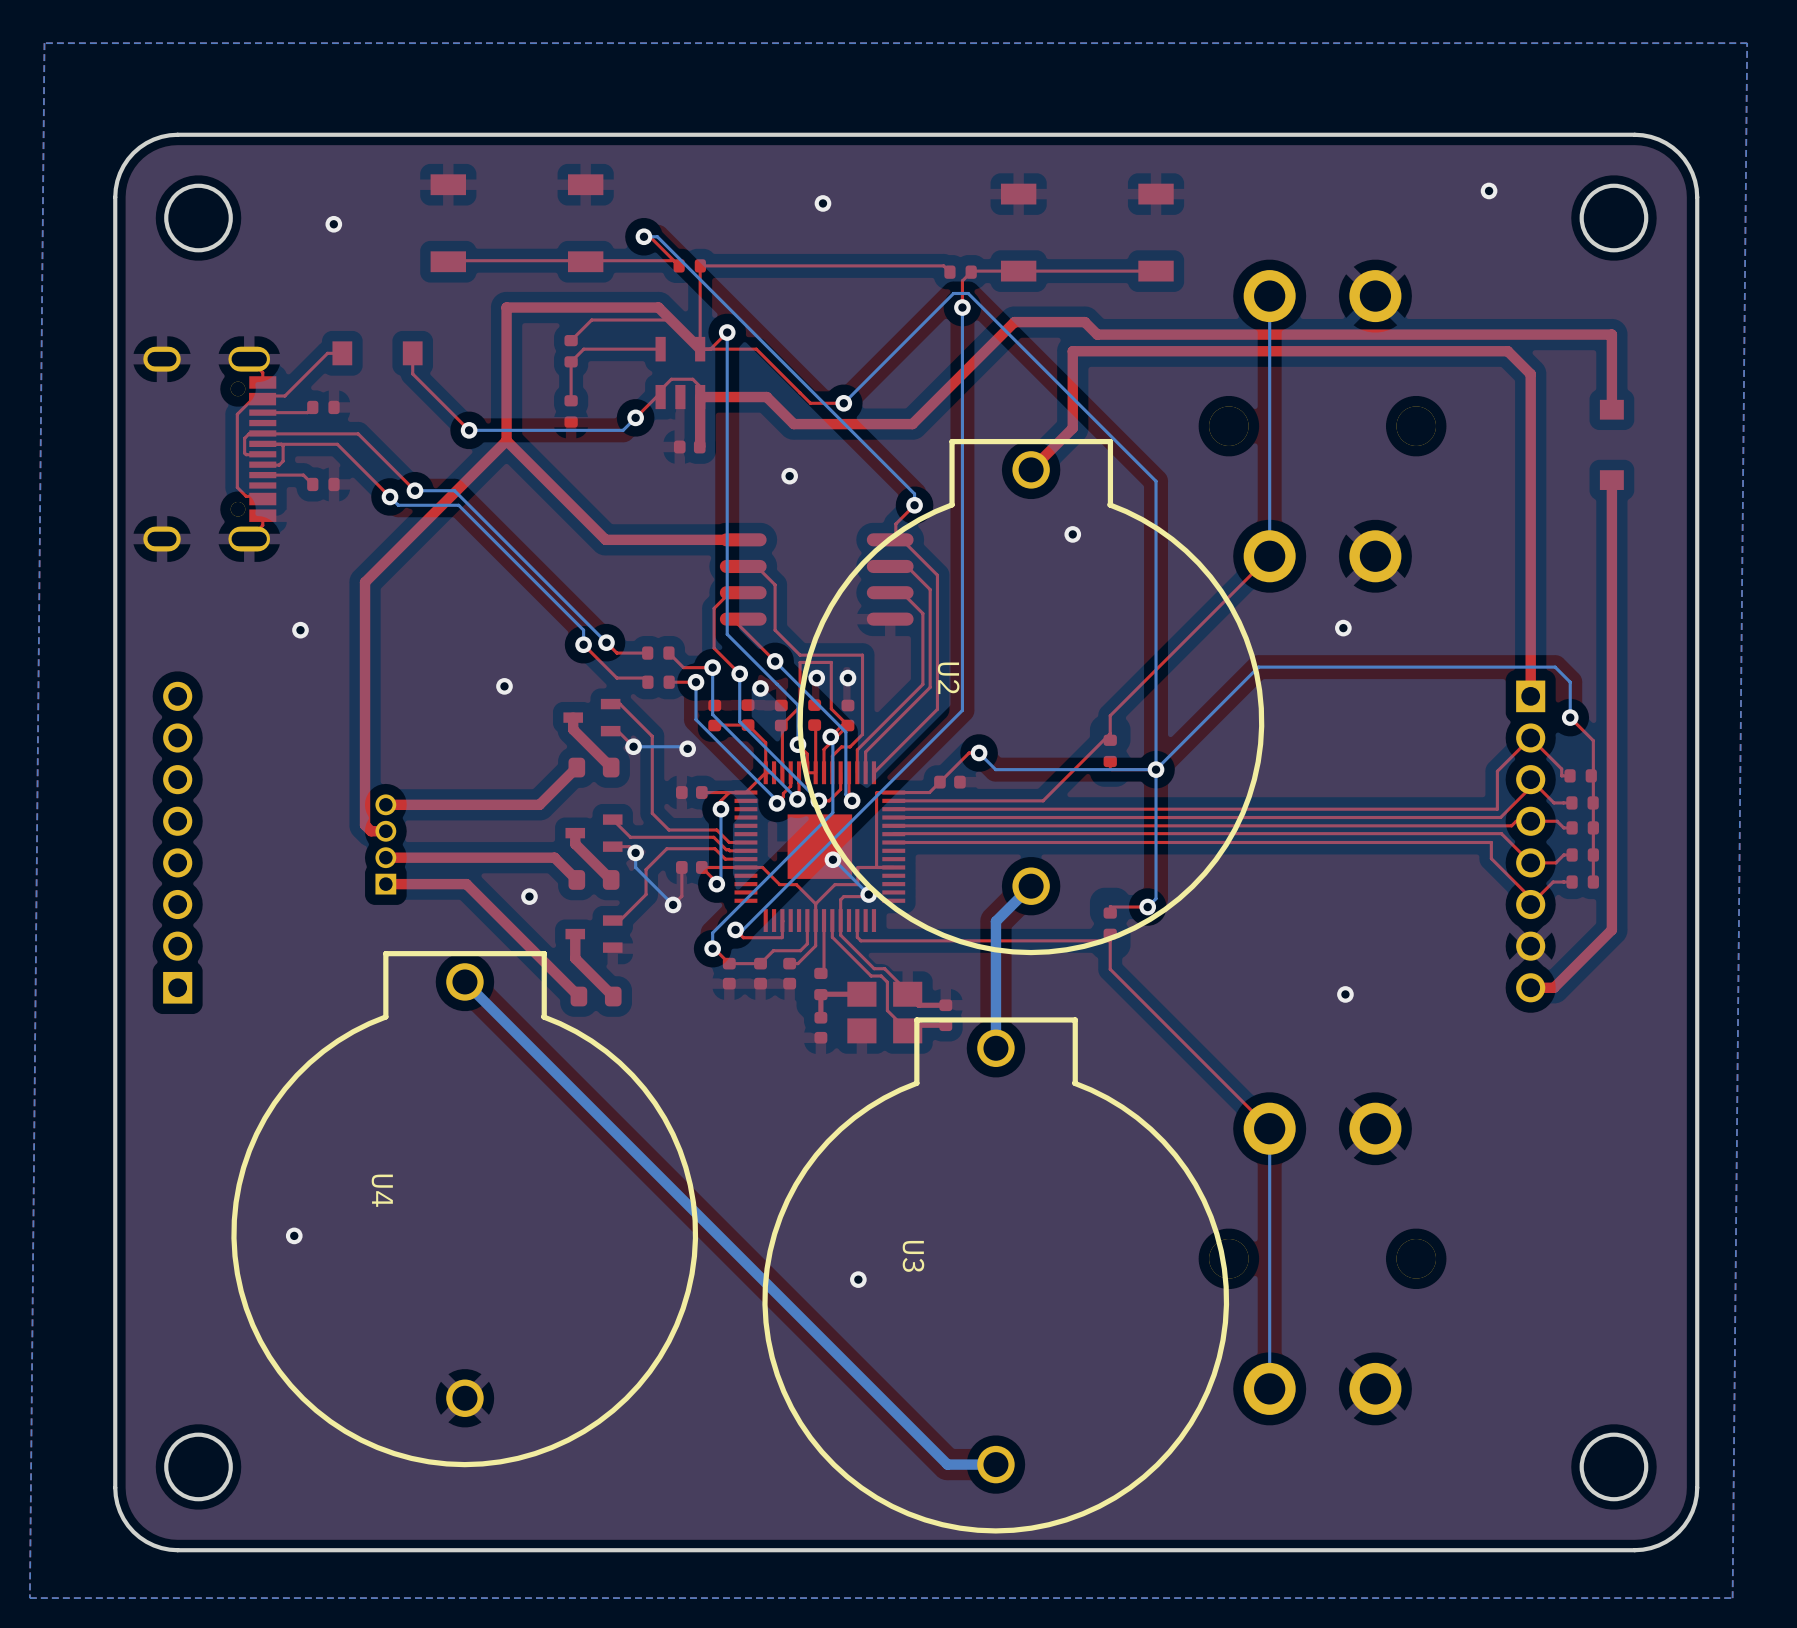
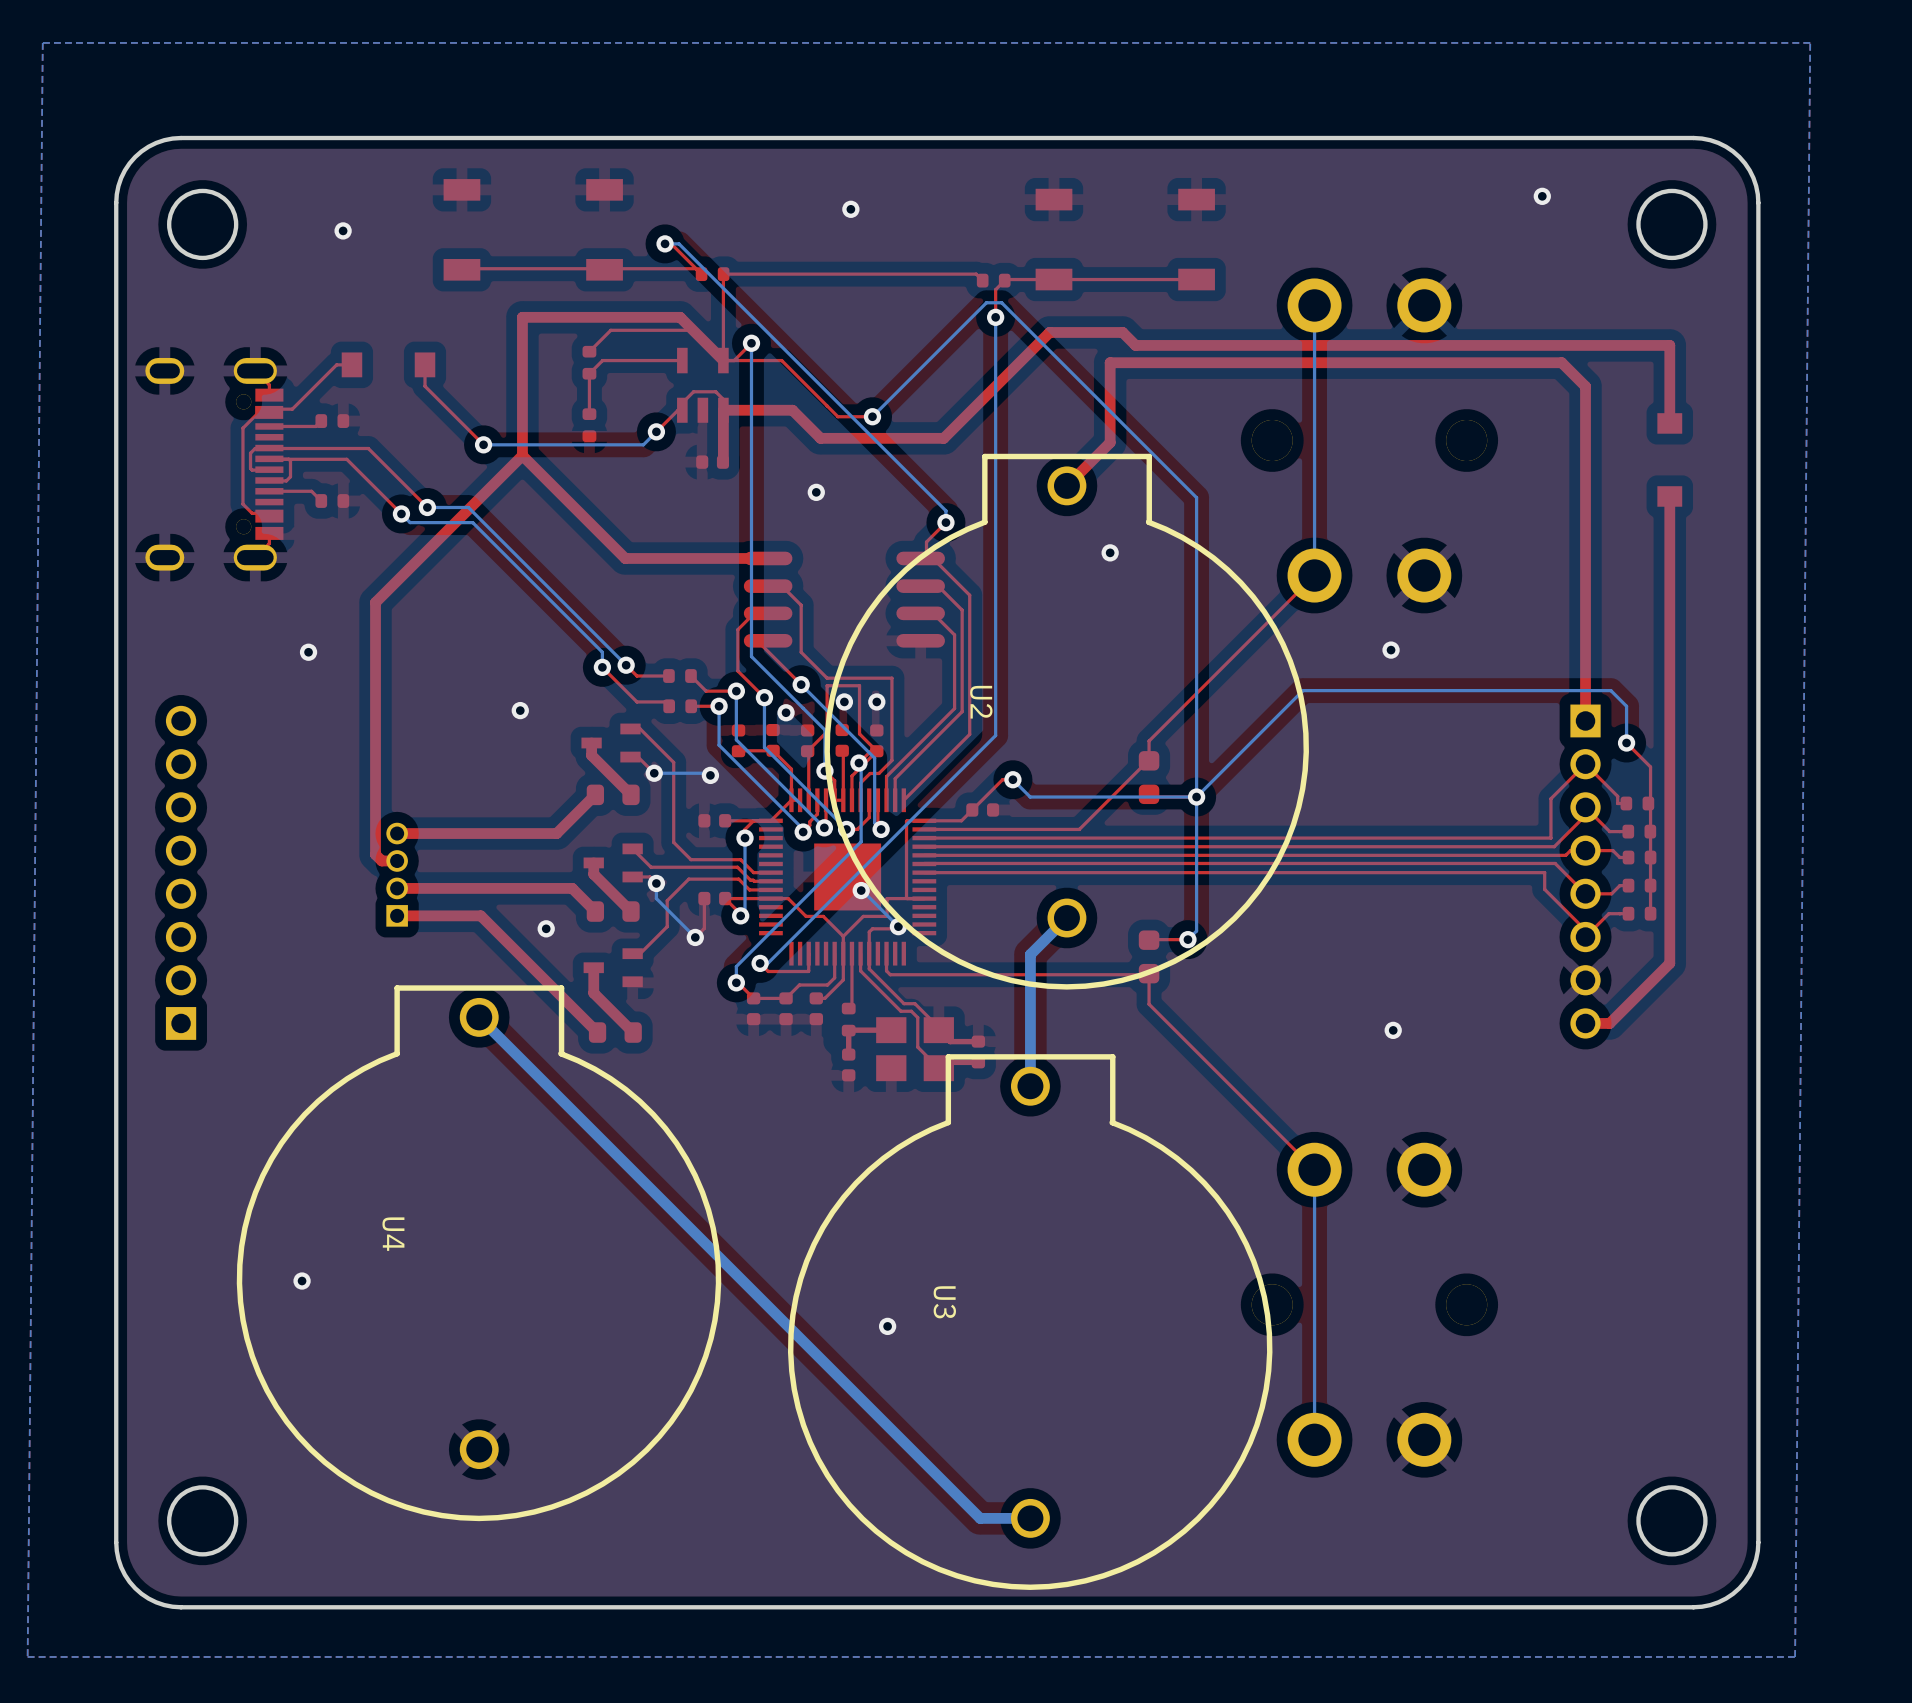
part footprint: [1103, 734, 1117, 768] -> [1138, 751, 1160, 805]
part footprint: [1103, 907, 1117, 940] -> [1138, 930, 1160, 984]

